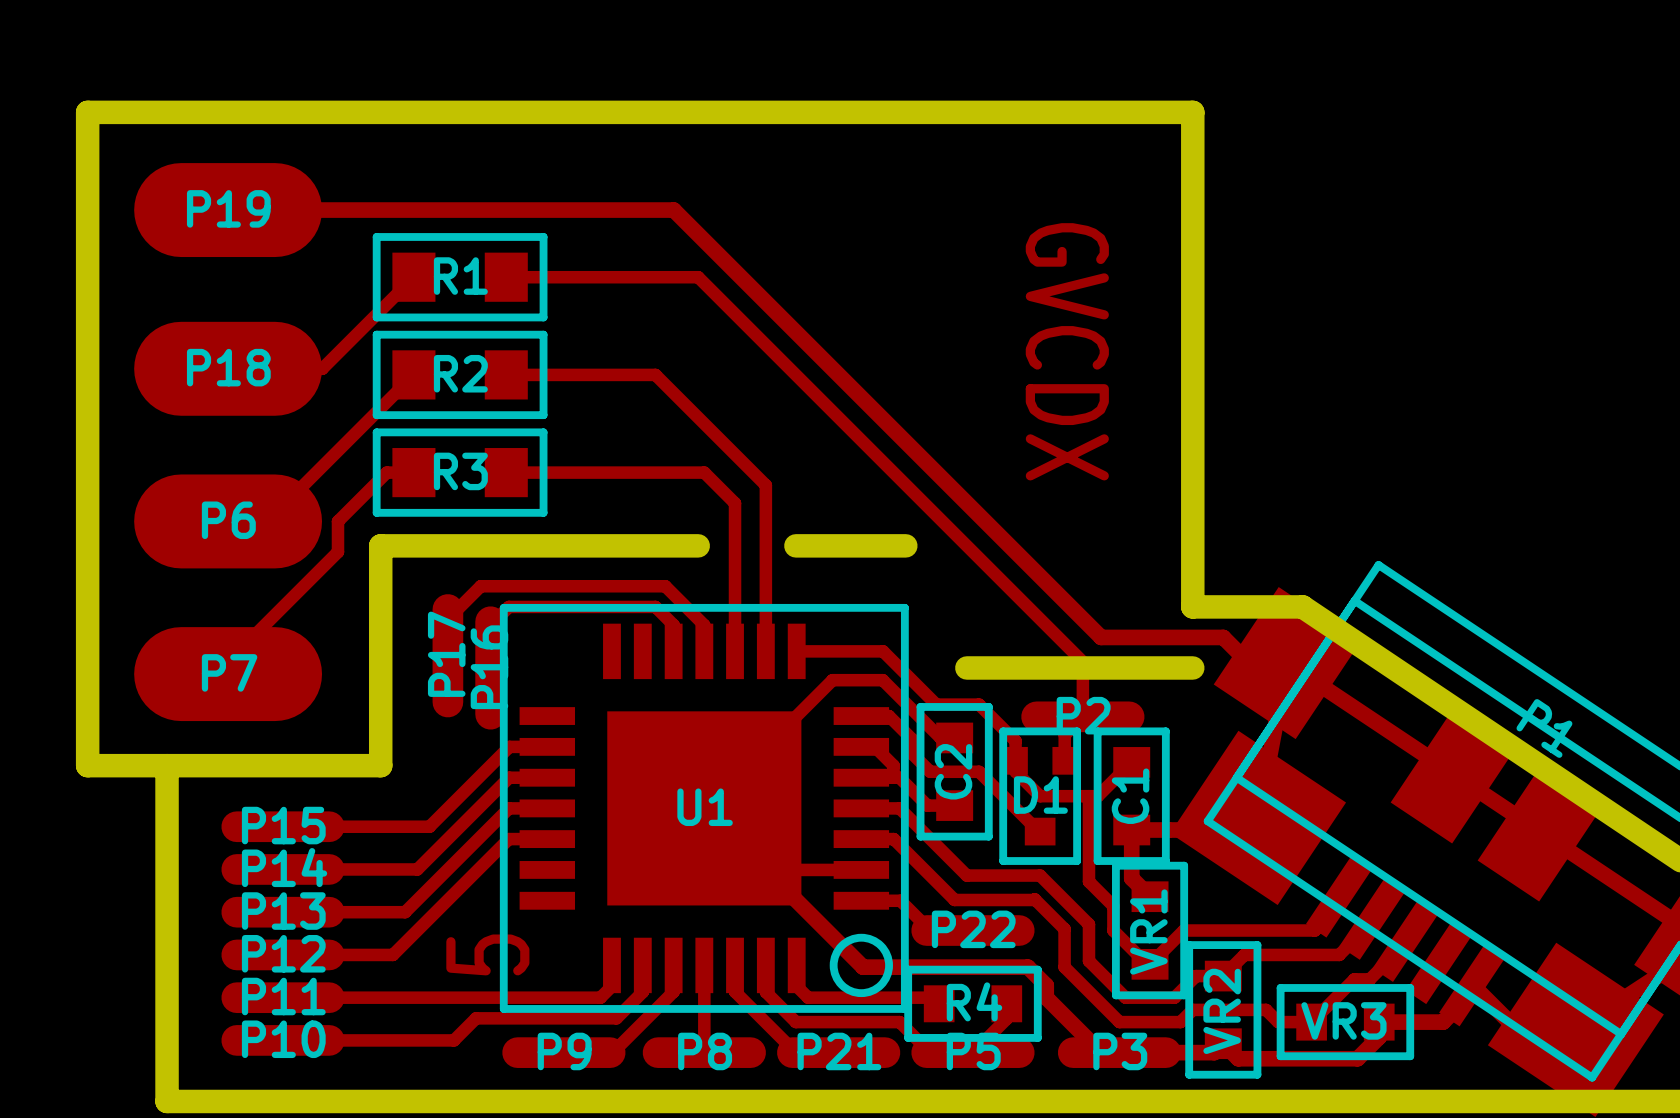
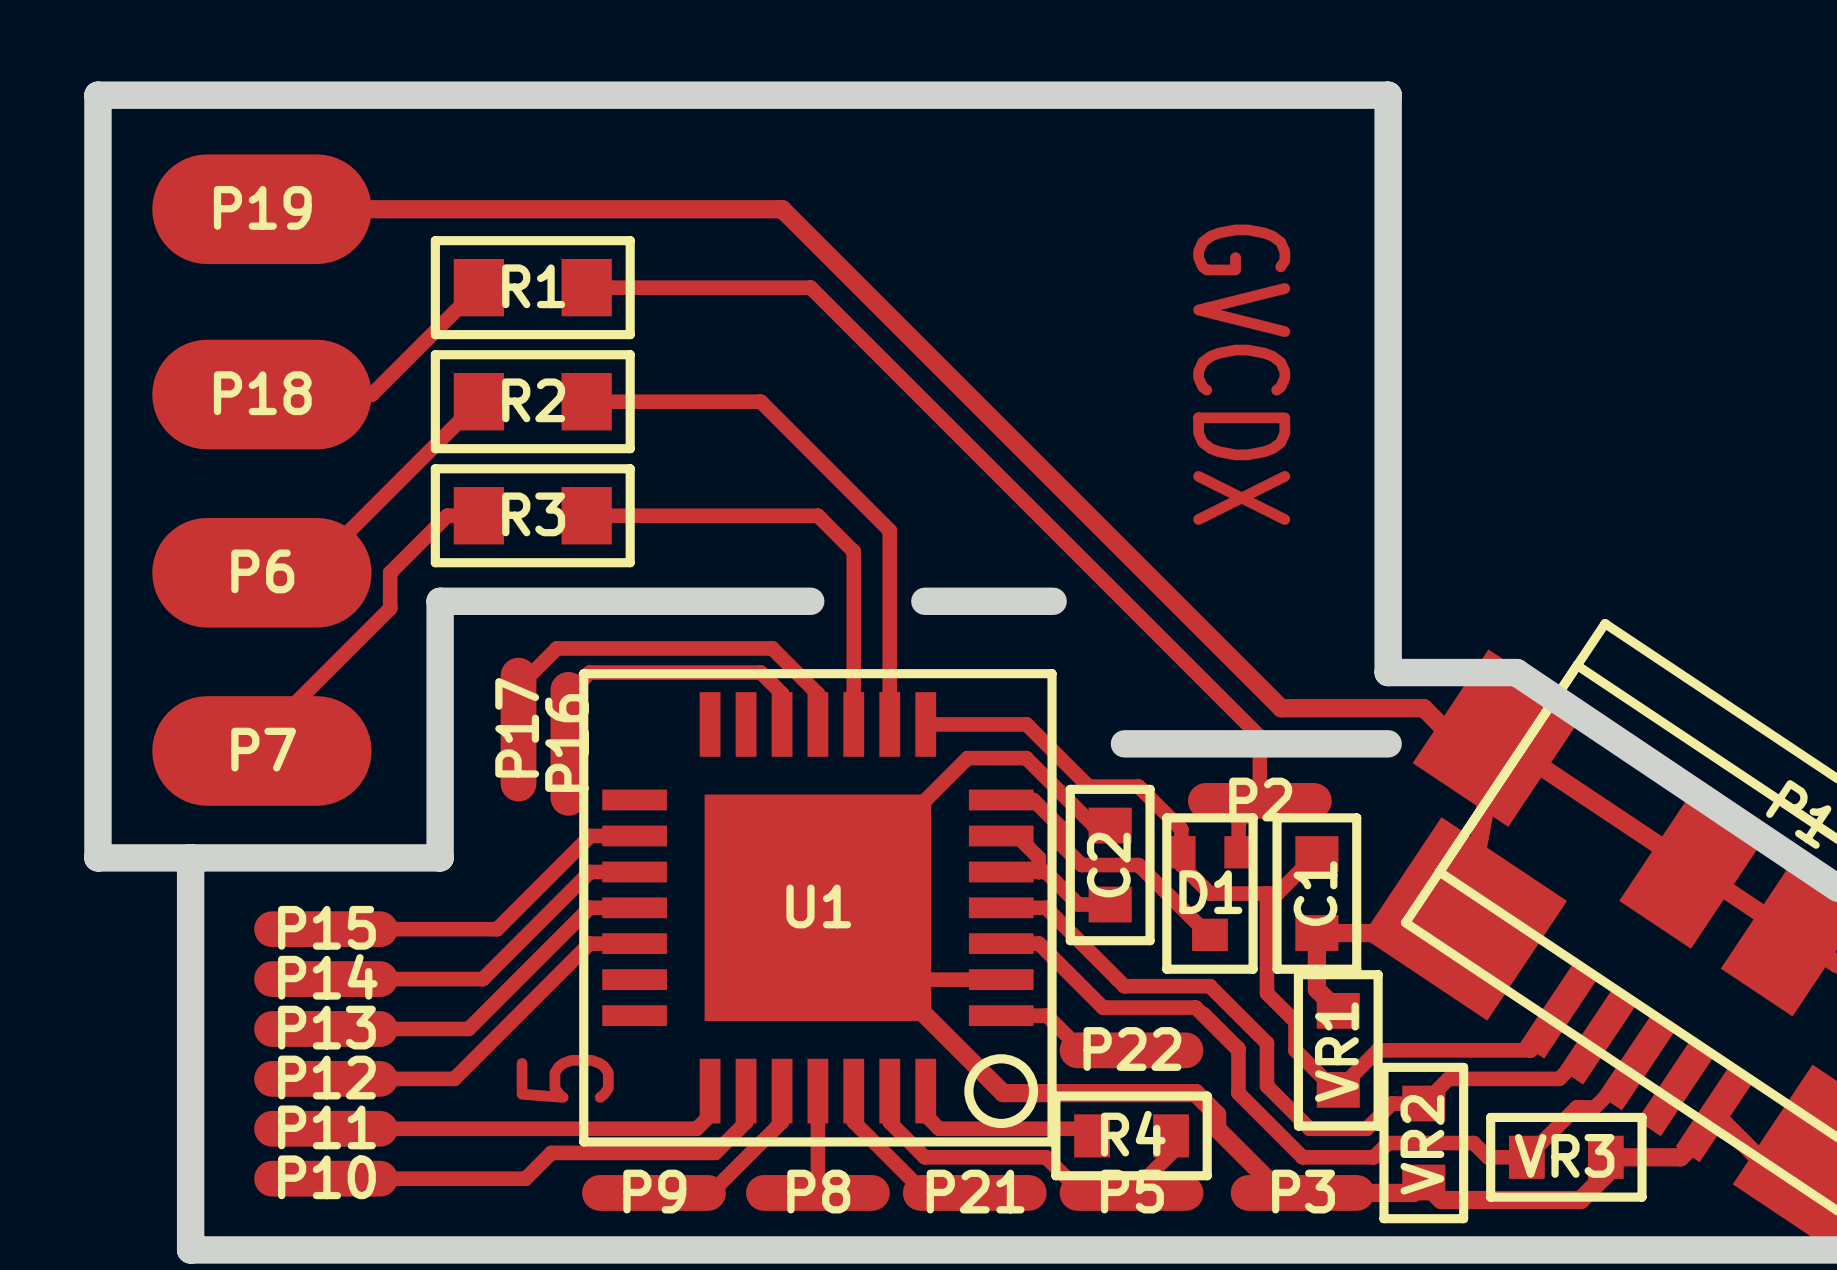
track: (948, 893) (954, 899) (1034, 899) -> (1103, 1007) (1195, 1007) (1238, 1050)

